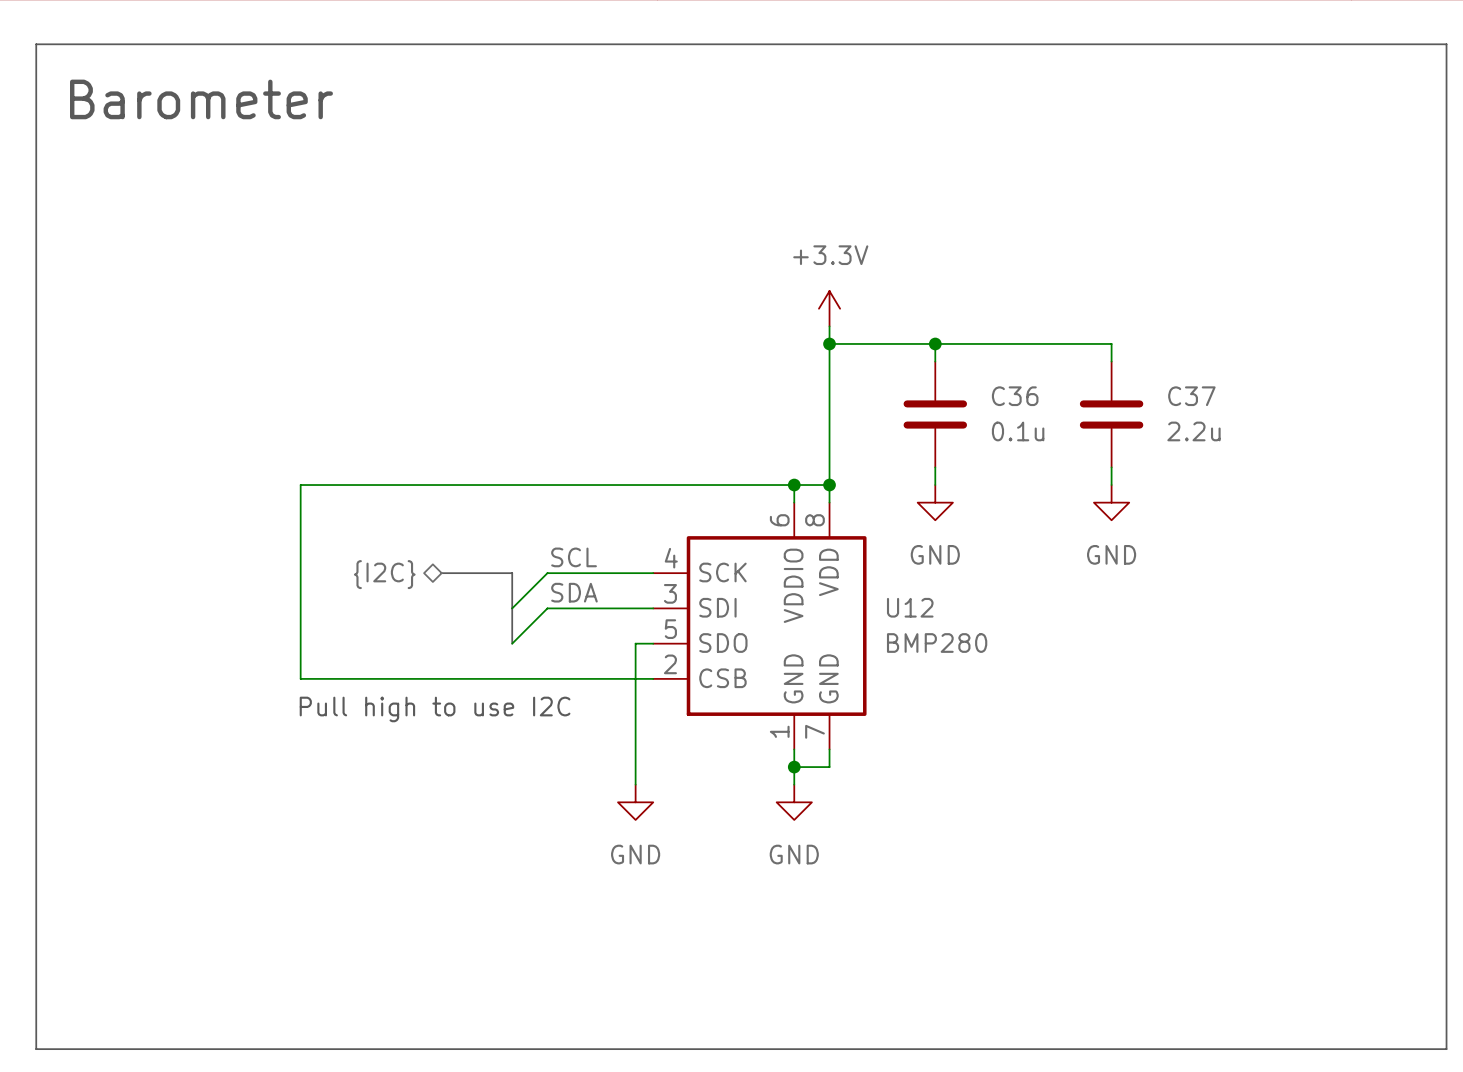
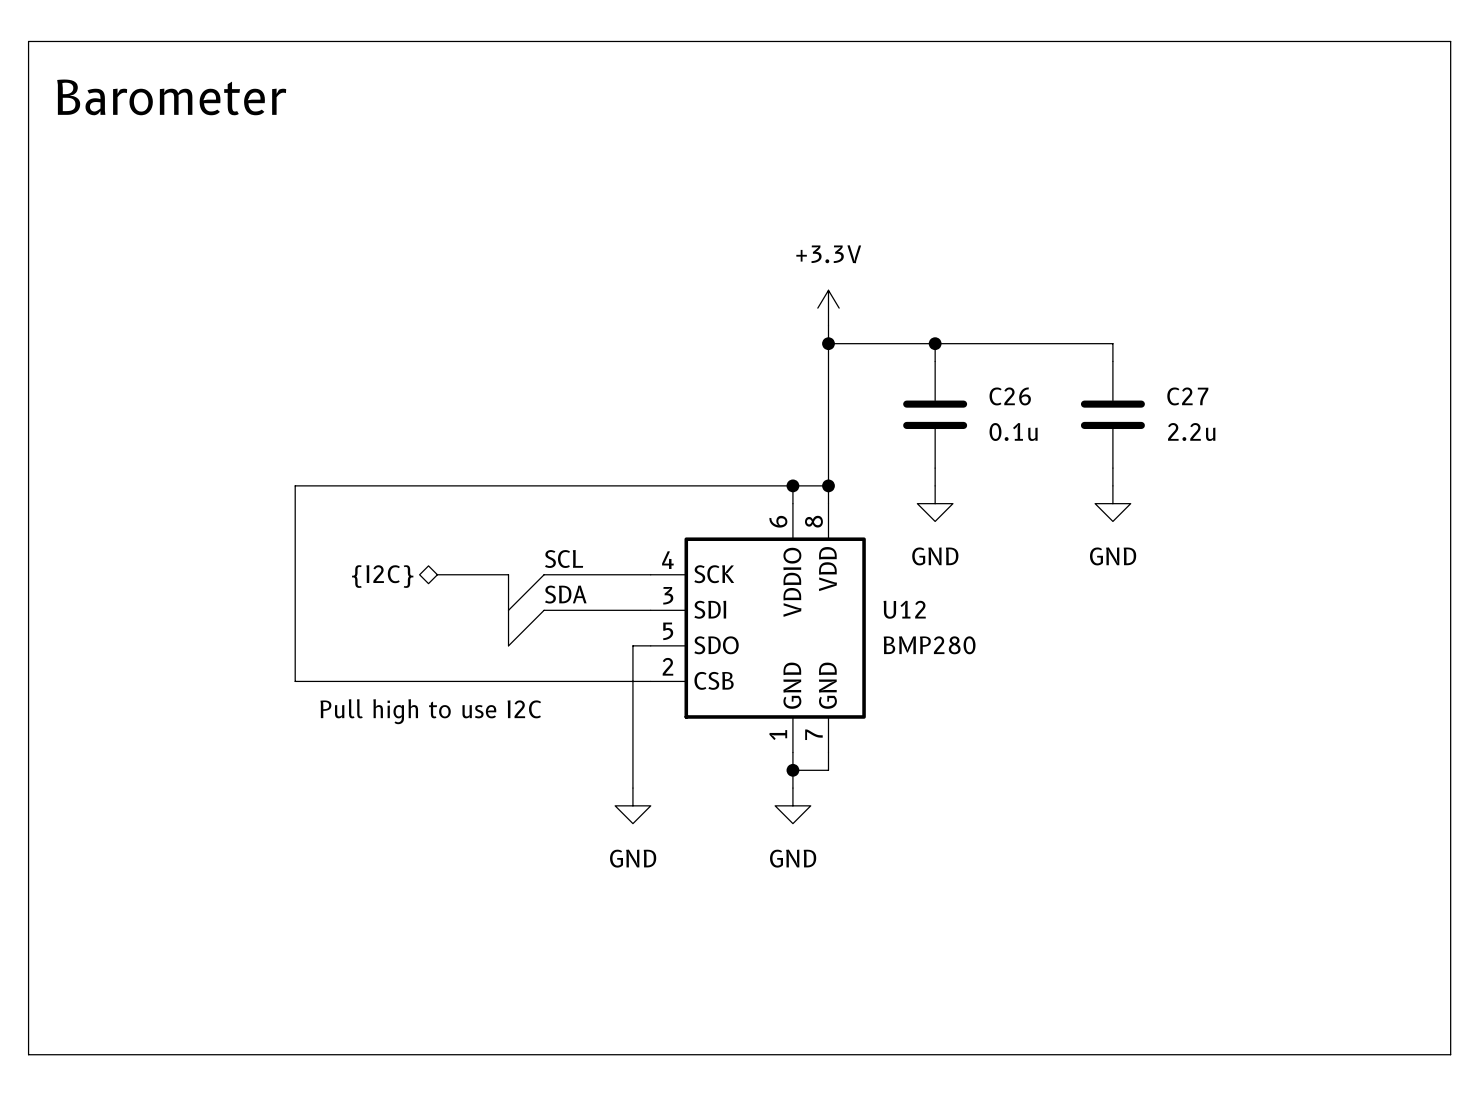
C36 name: C36 (1015, 396) -> C26 (1010, 396)
C37 name: C37 (1191, 396) -> C27 (1187, 396)

